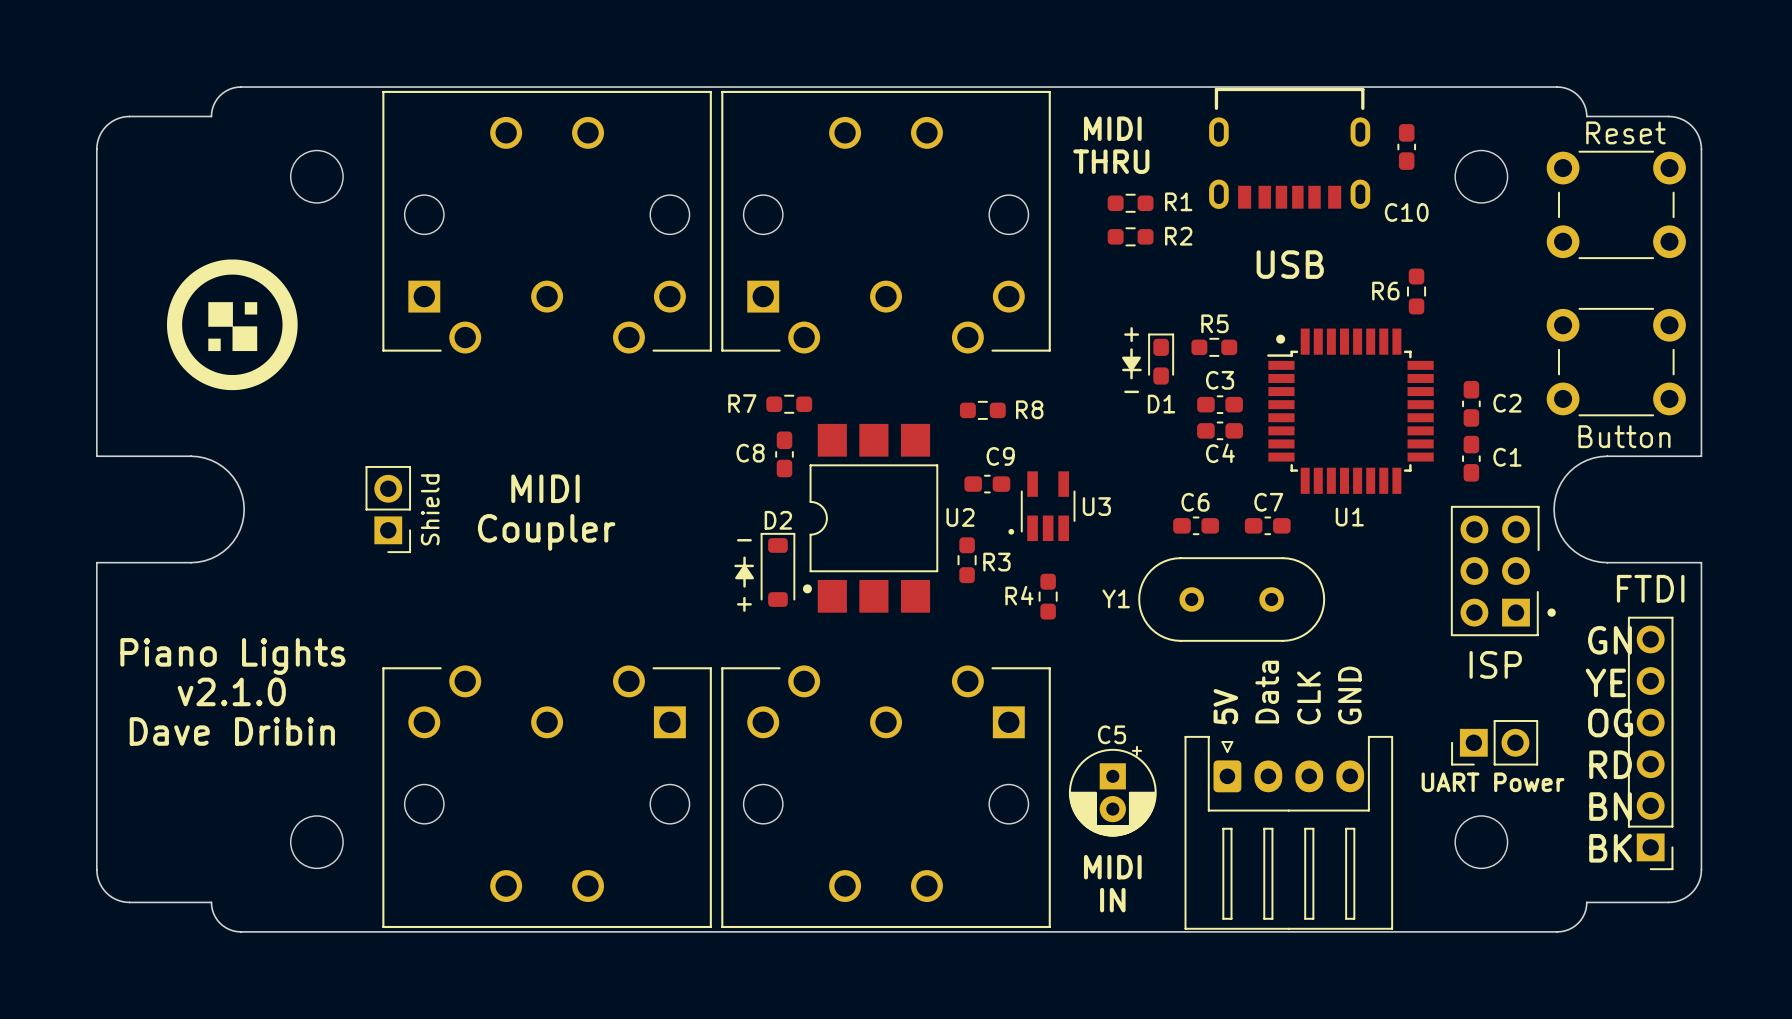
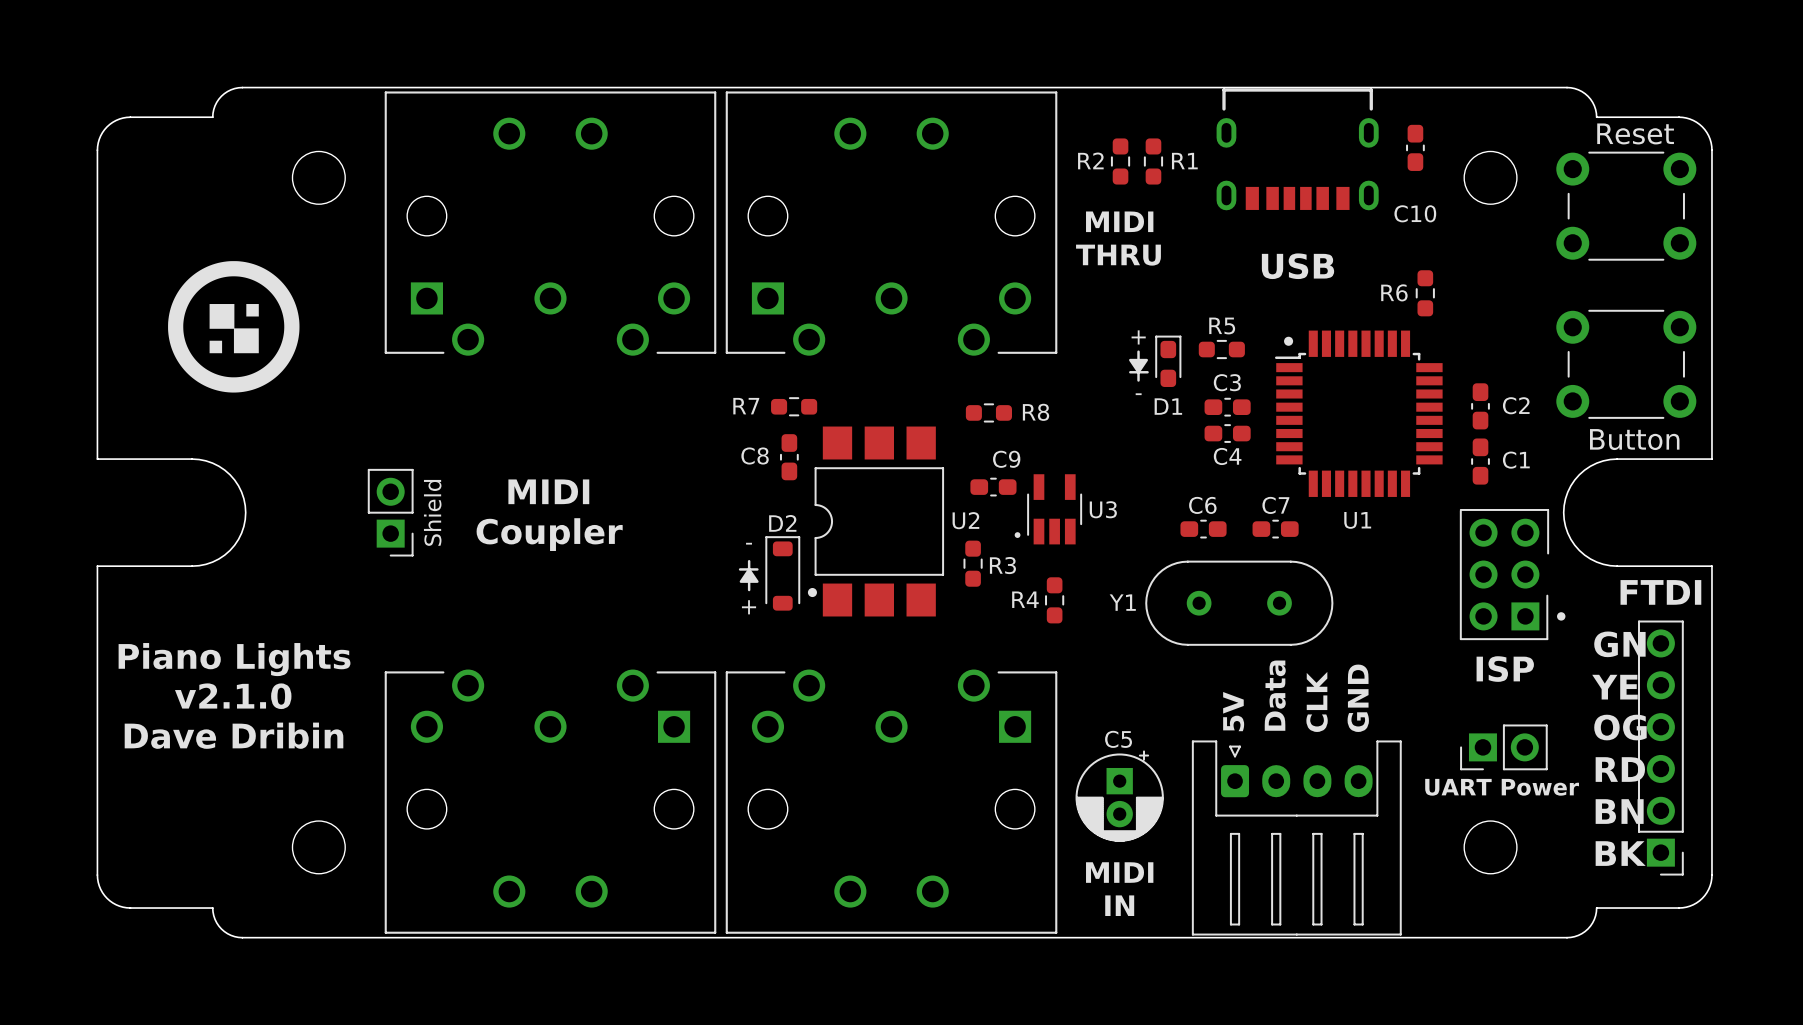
text position: MIDI (1112, 128) -> MIDI (1119, 221)
text position: THRU (1111, 161) -> THRU (1118, 255)
R1 rotation: 0° (1130, 203) -> 90° clockwise (1153, 161)
R1 position: (1130, 203) -> (1153, 161)
R2 rotation: 0° (1130, 236) -> 90° clockwise (1120, 161)
R2 position: (1130, 236) -> (1120, 161)
R2 name position: R2 (1178, 236) -> R2 (1090, 160)

